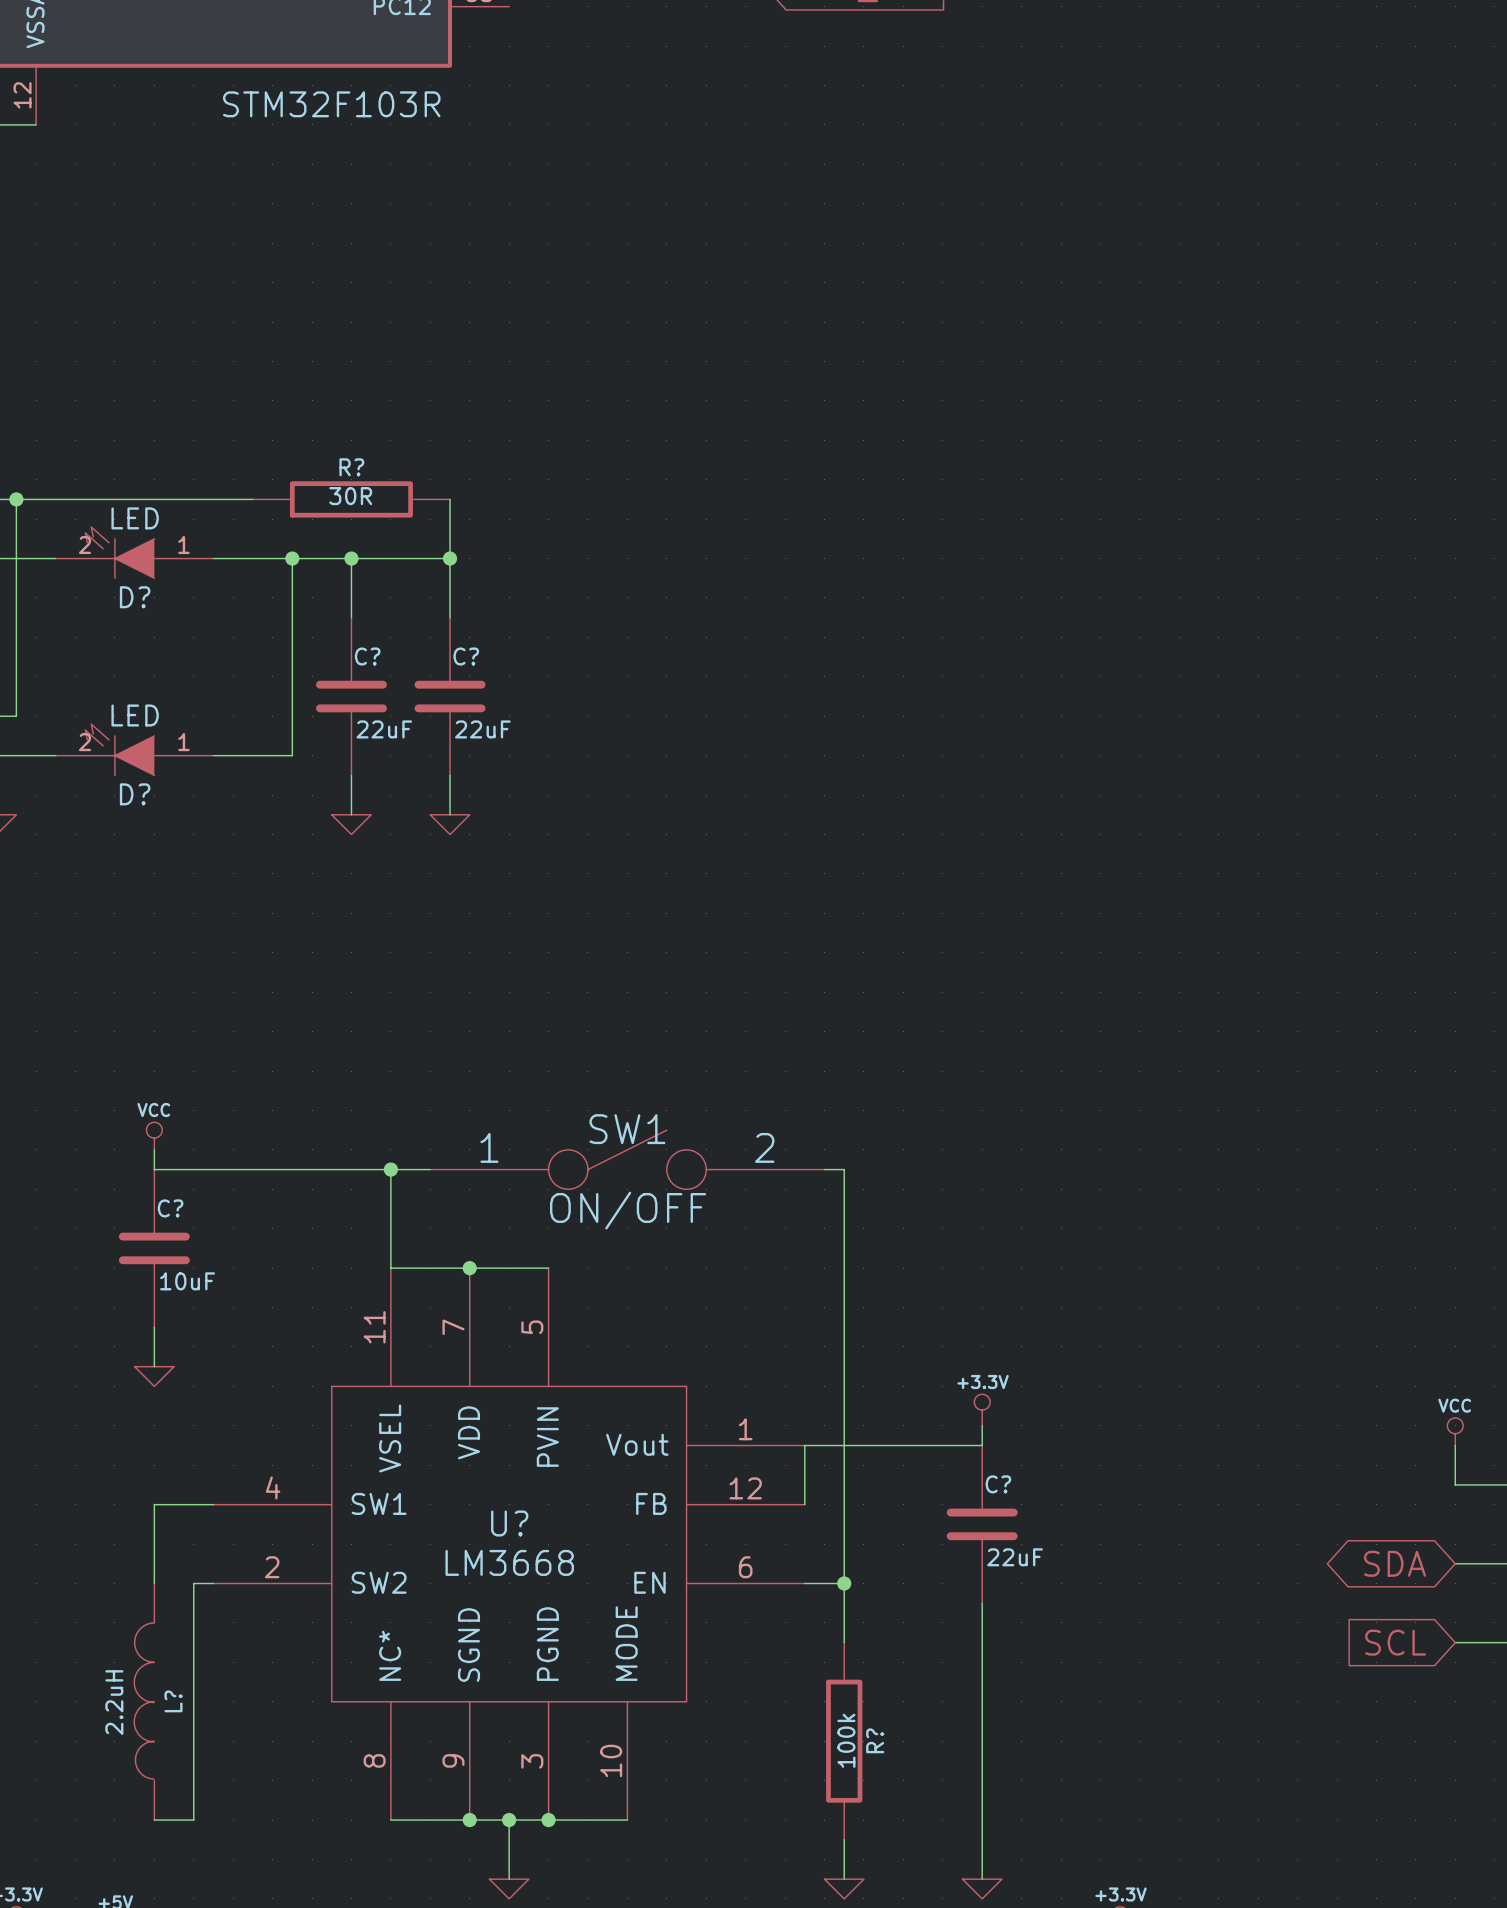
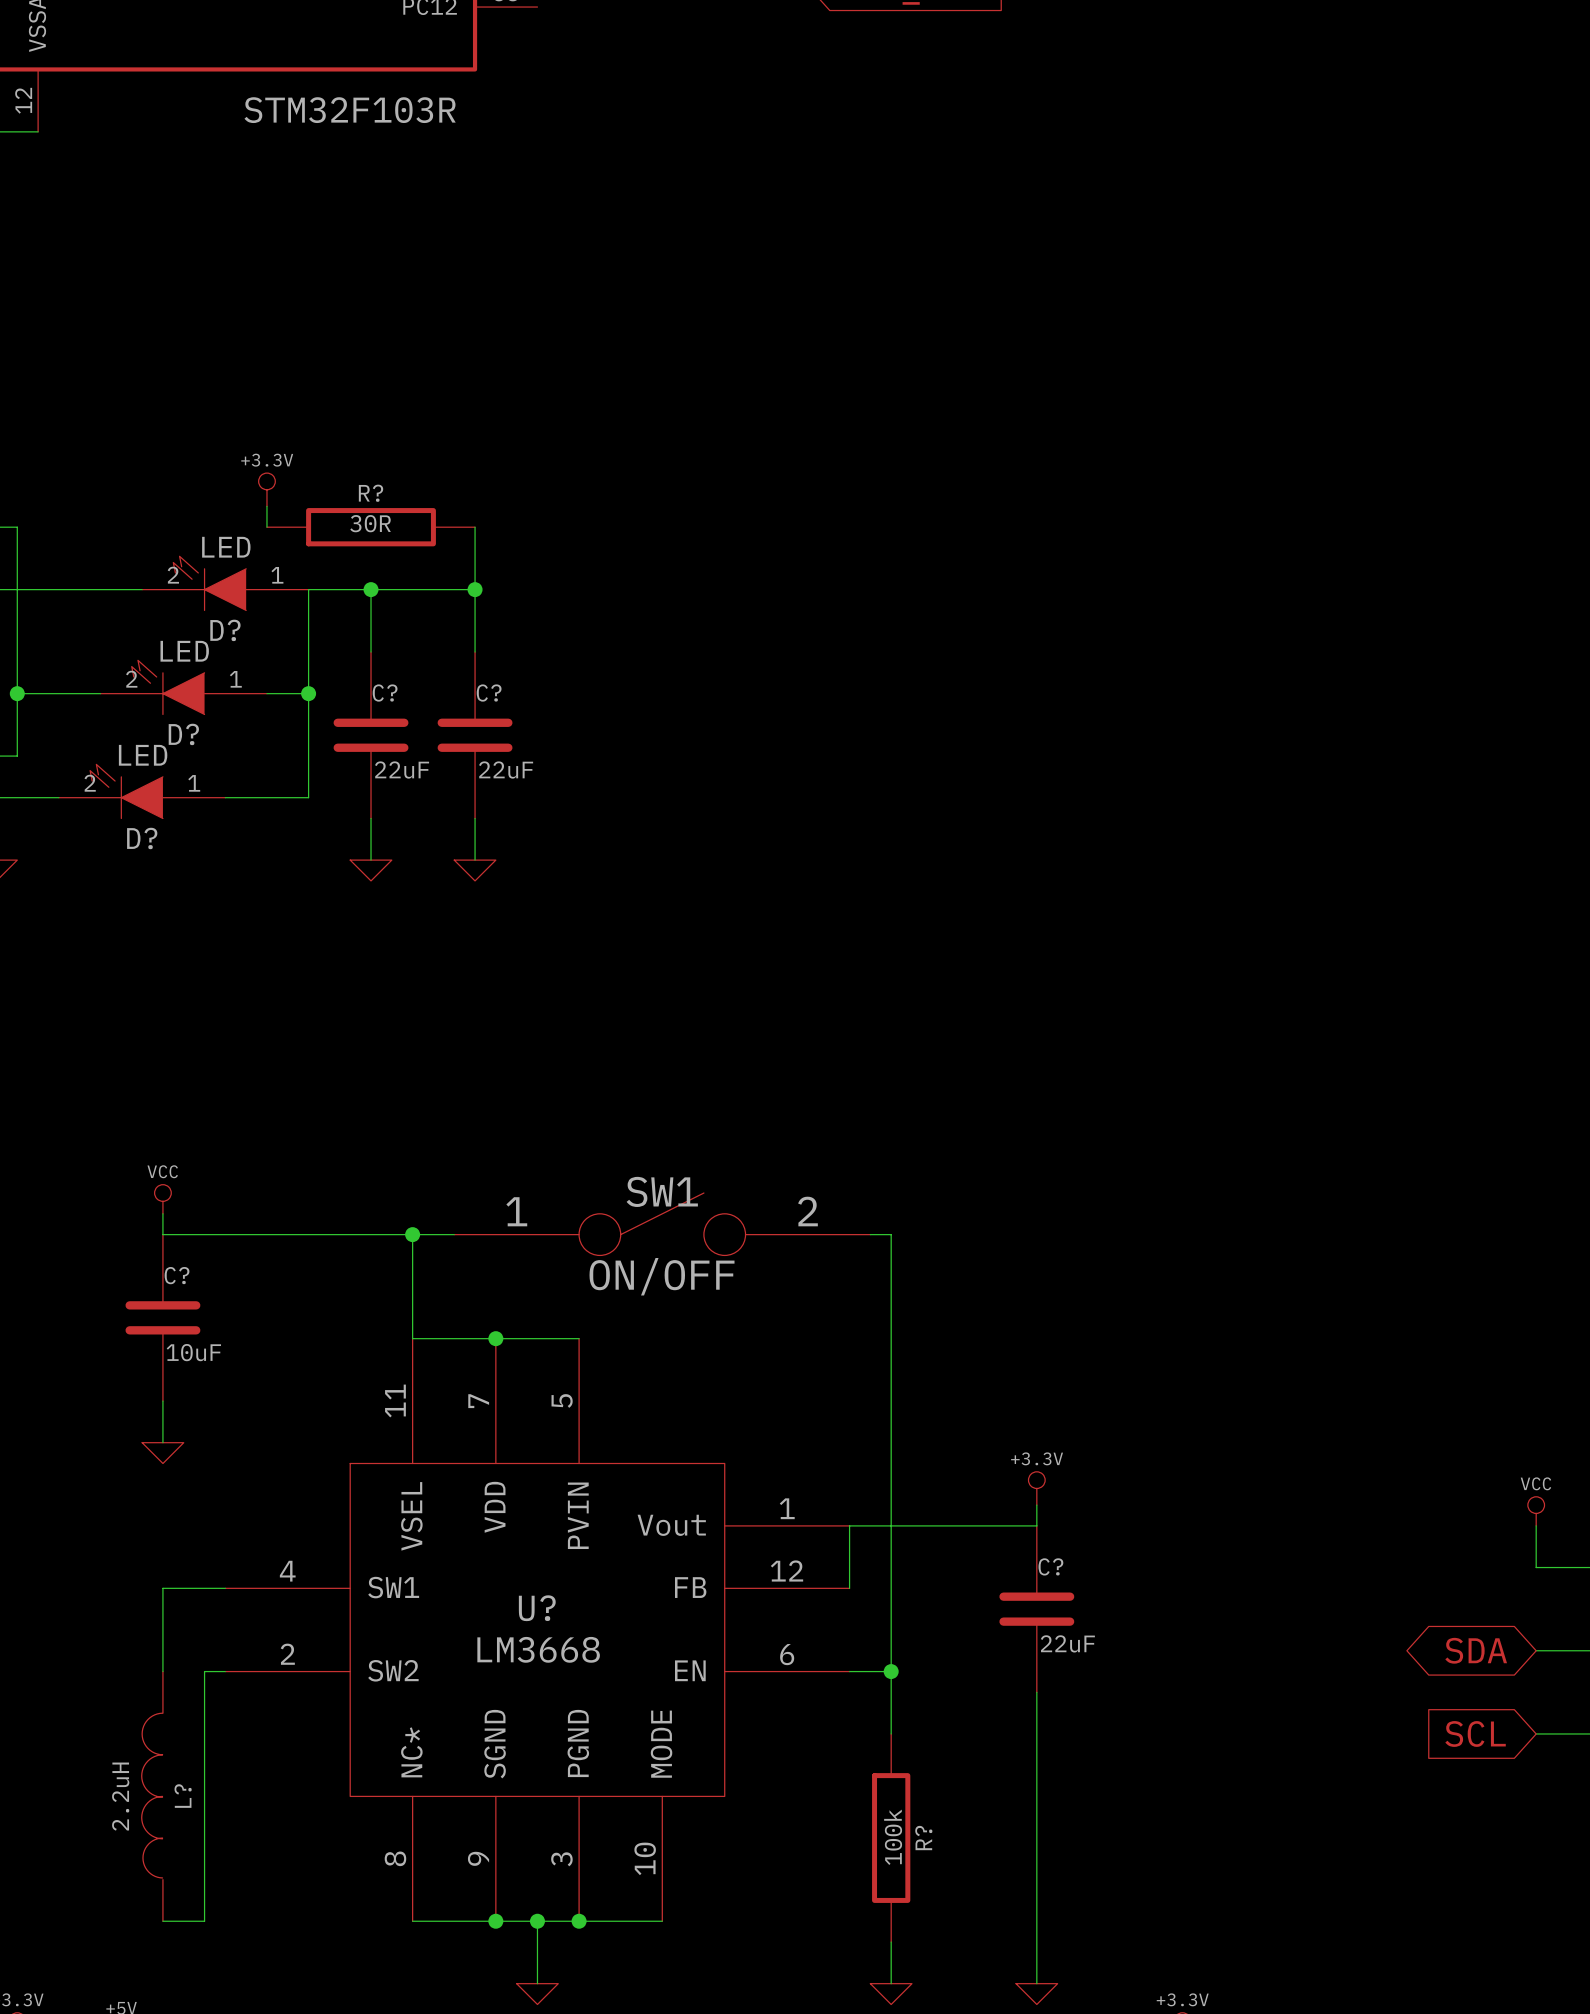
power symbol: none -> +3.3V (266, 489)
wire: (16, 499) (252, 499) -> (266, 506) (266, 527)
junction: (16, 499) -> none
D?: LED (134, 552) -> none
D?: none -> LED (225, 583)
junction: (292, 558) -> none
D?: none -> LED (183, 687)
wire: none -> (17, 693) (100, 693)
junction: none -> (17, 693)
wire: none -> (266, 693) (308, 693)
junction: none -> (308, 693)

